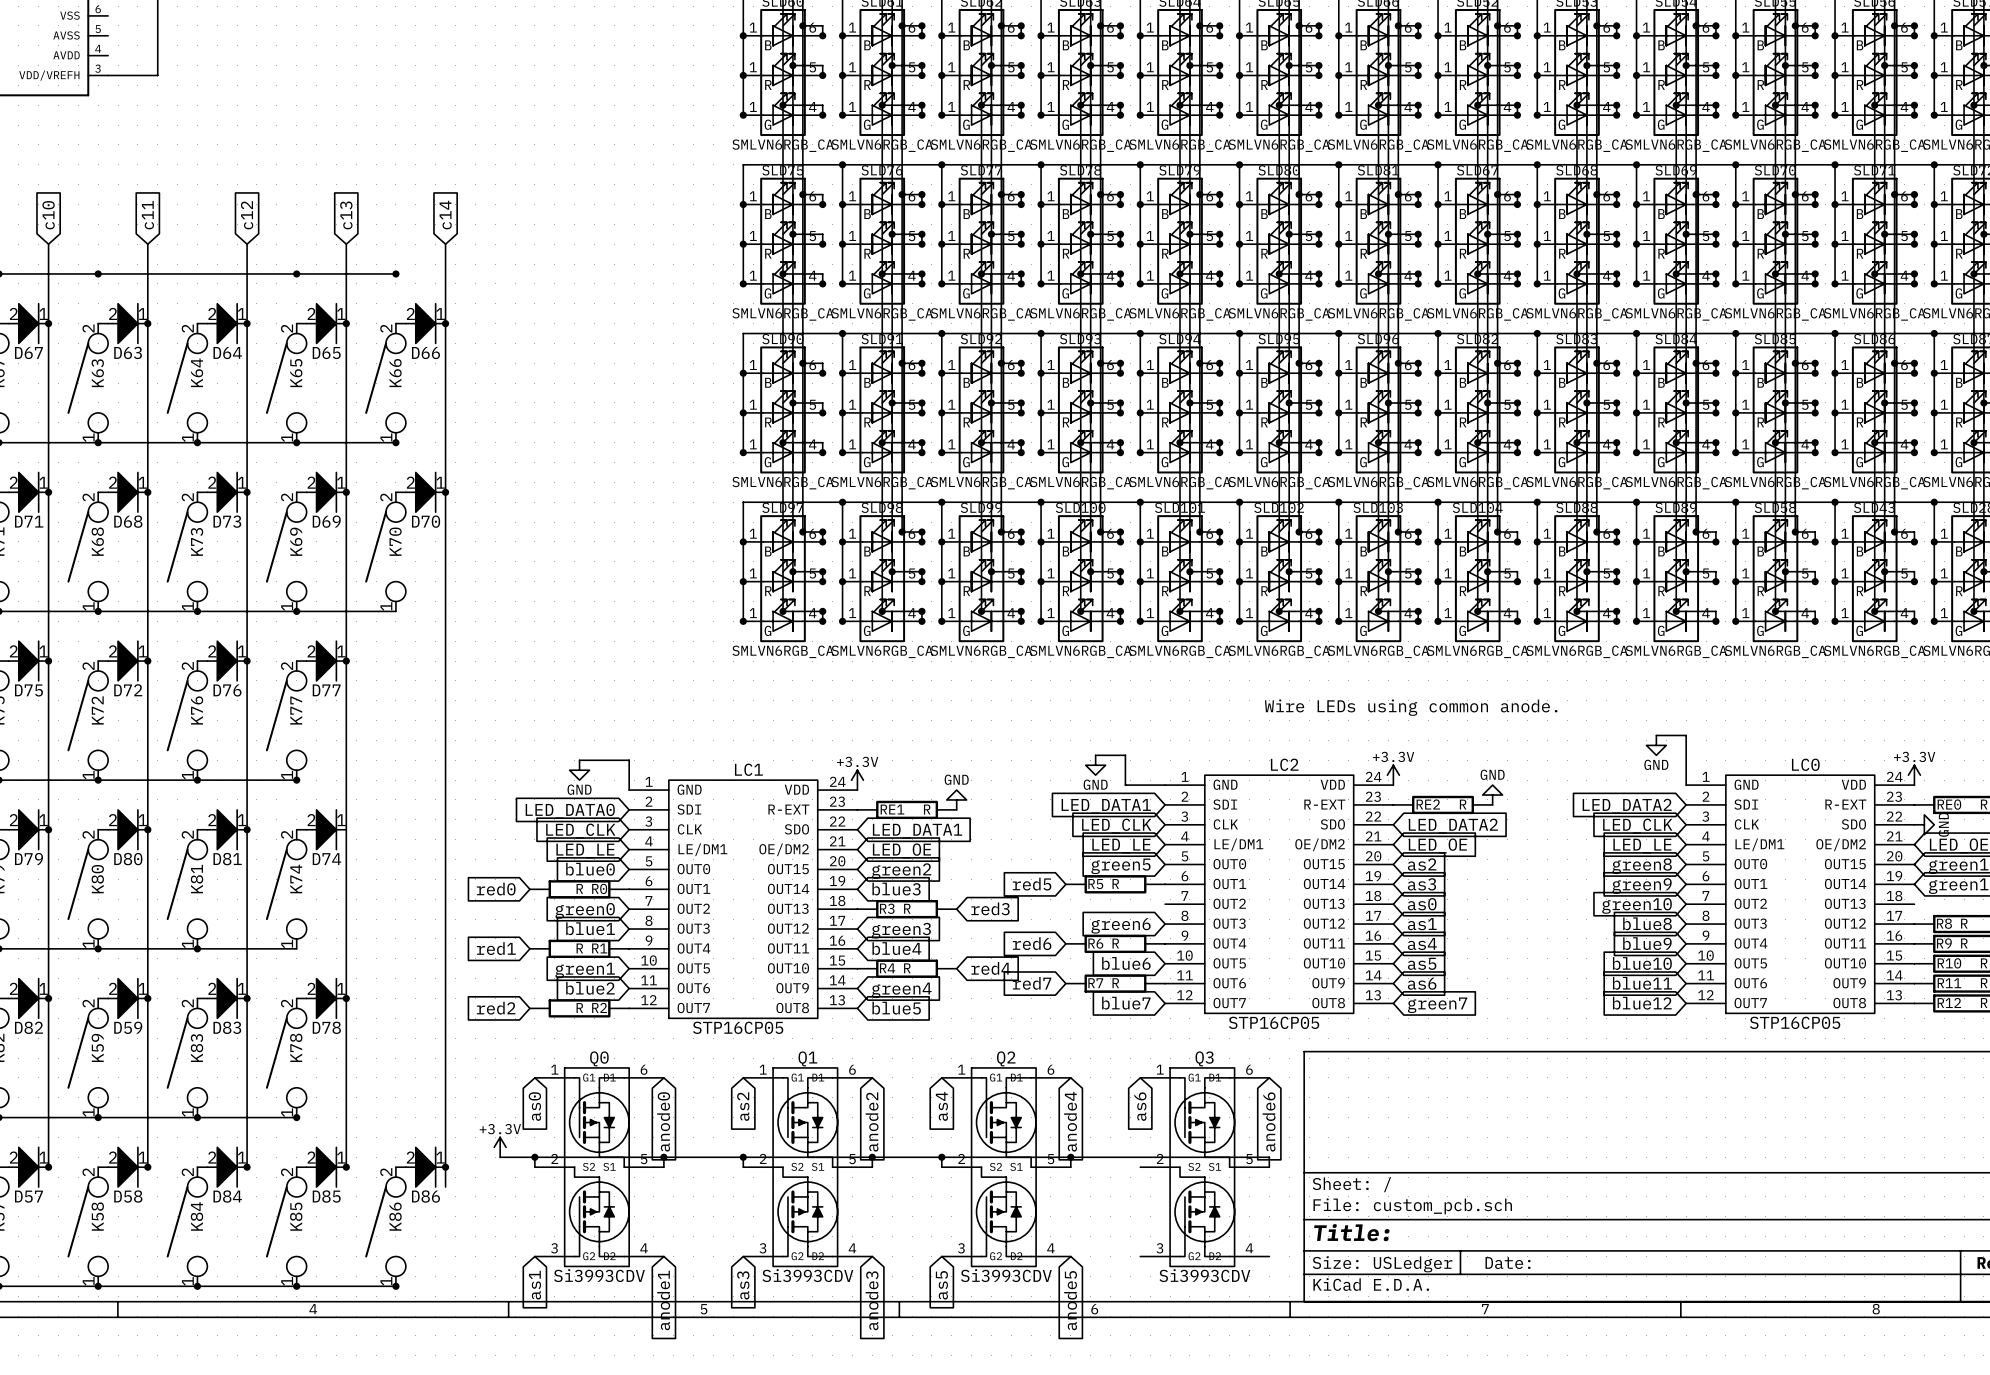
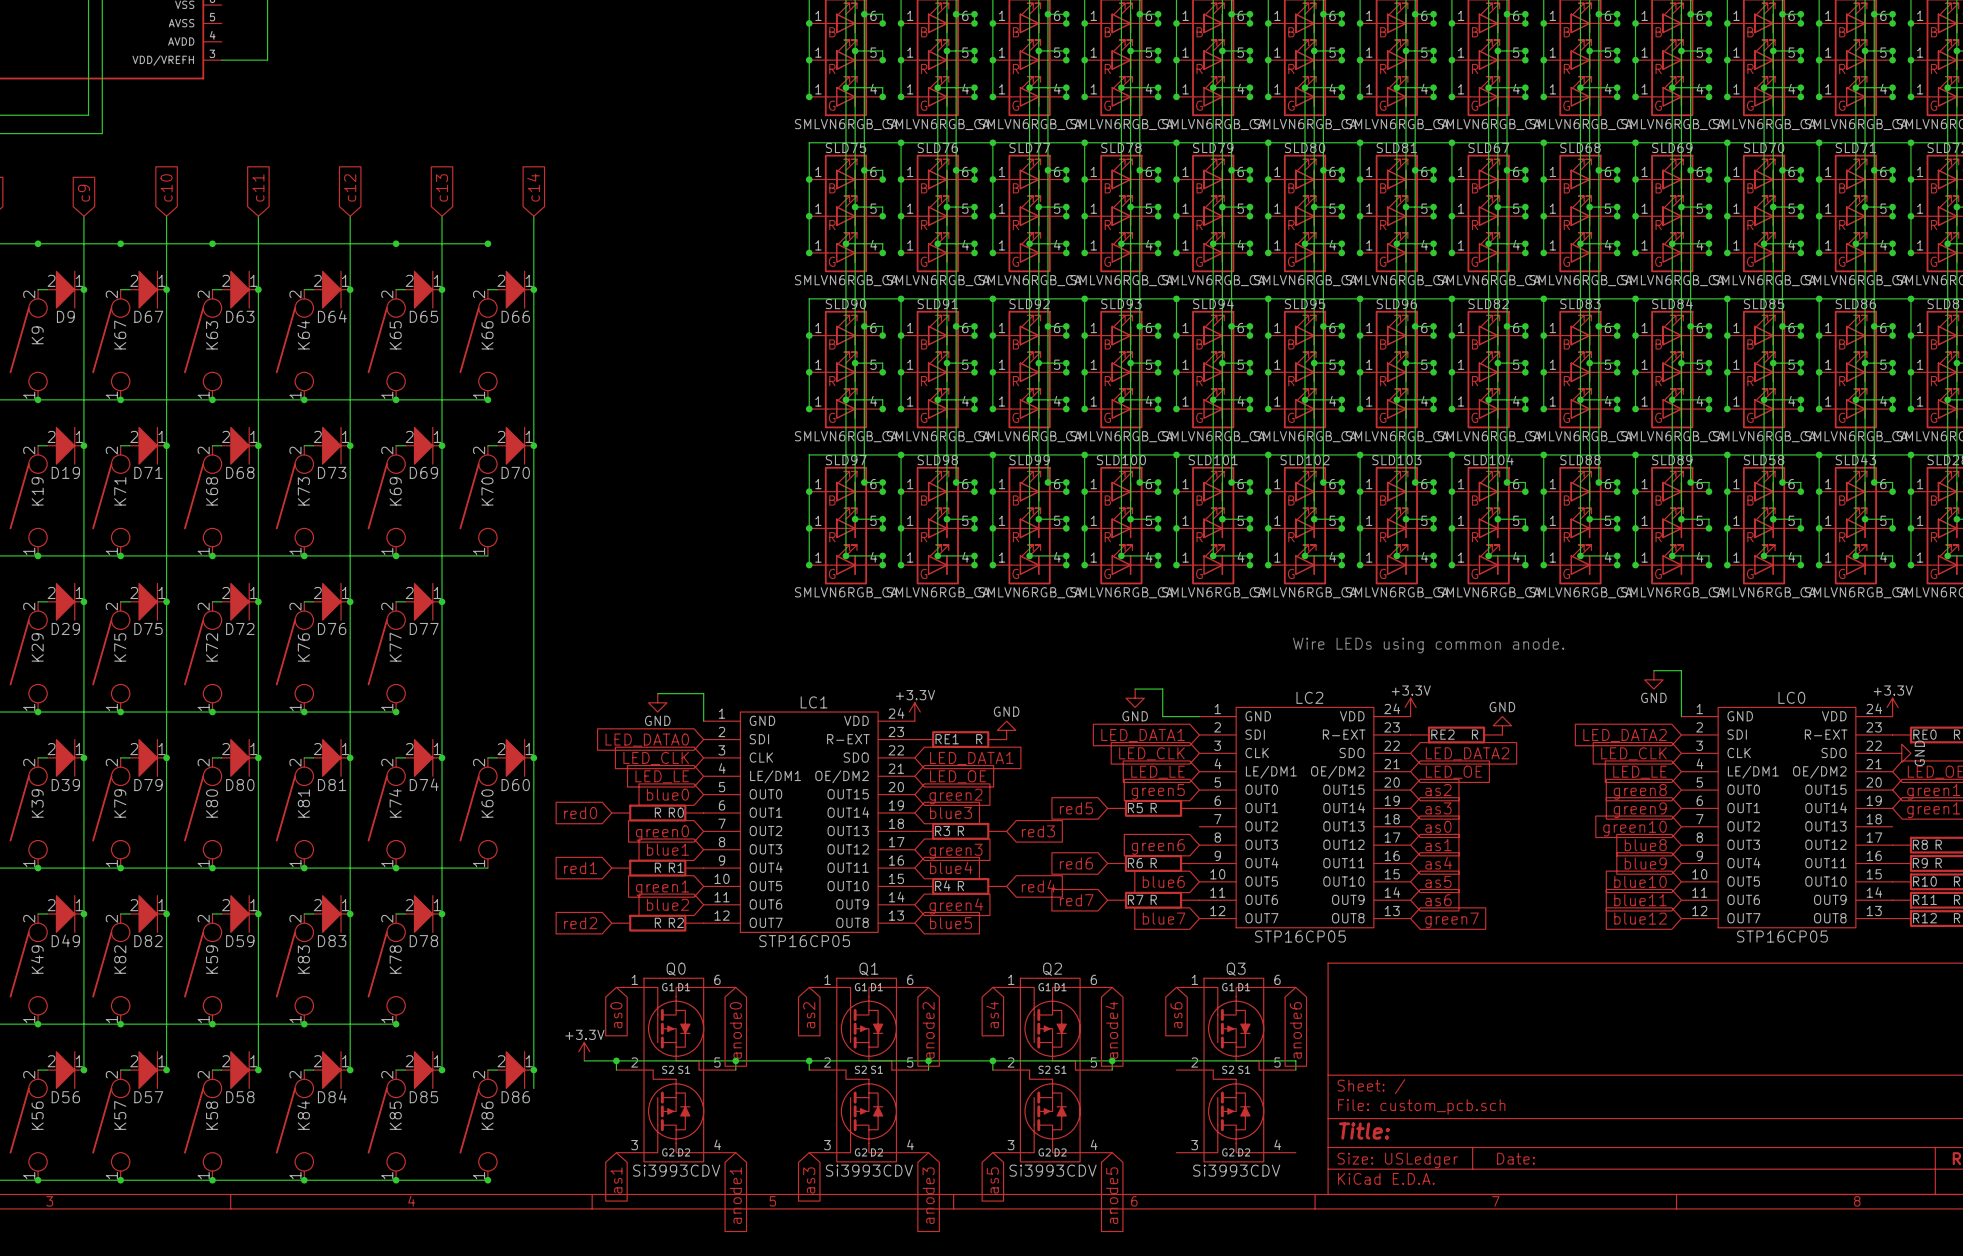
junction: none -> (442, 757)
wire: none -> (487, 757) (497, 757)
D60: none -> (515, 757)
junction: none -> (533, 757)
K60: none -> (478, 813)
wire: none -> (396, 868) (487, 868)
junction: none -> (396, 868)

